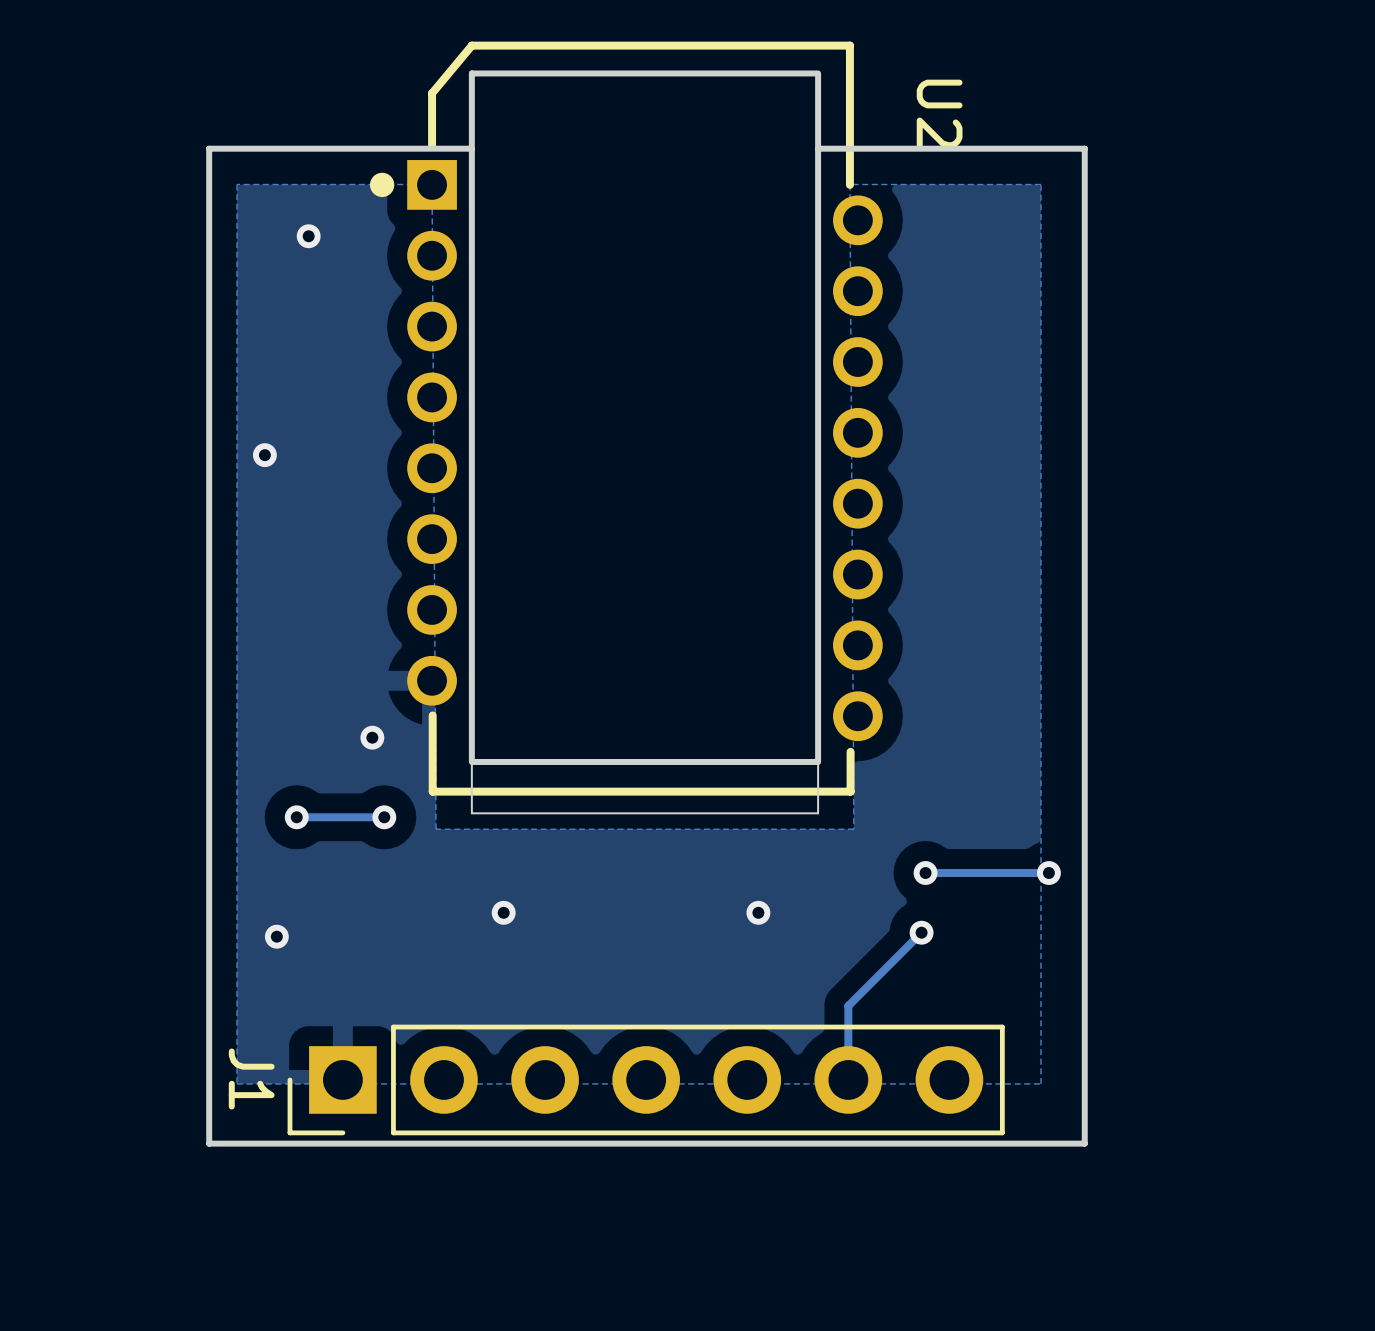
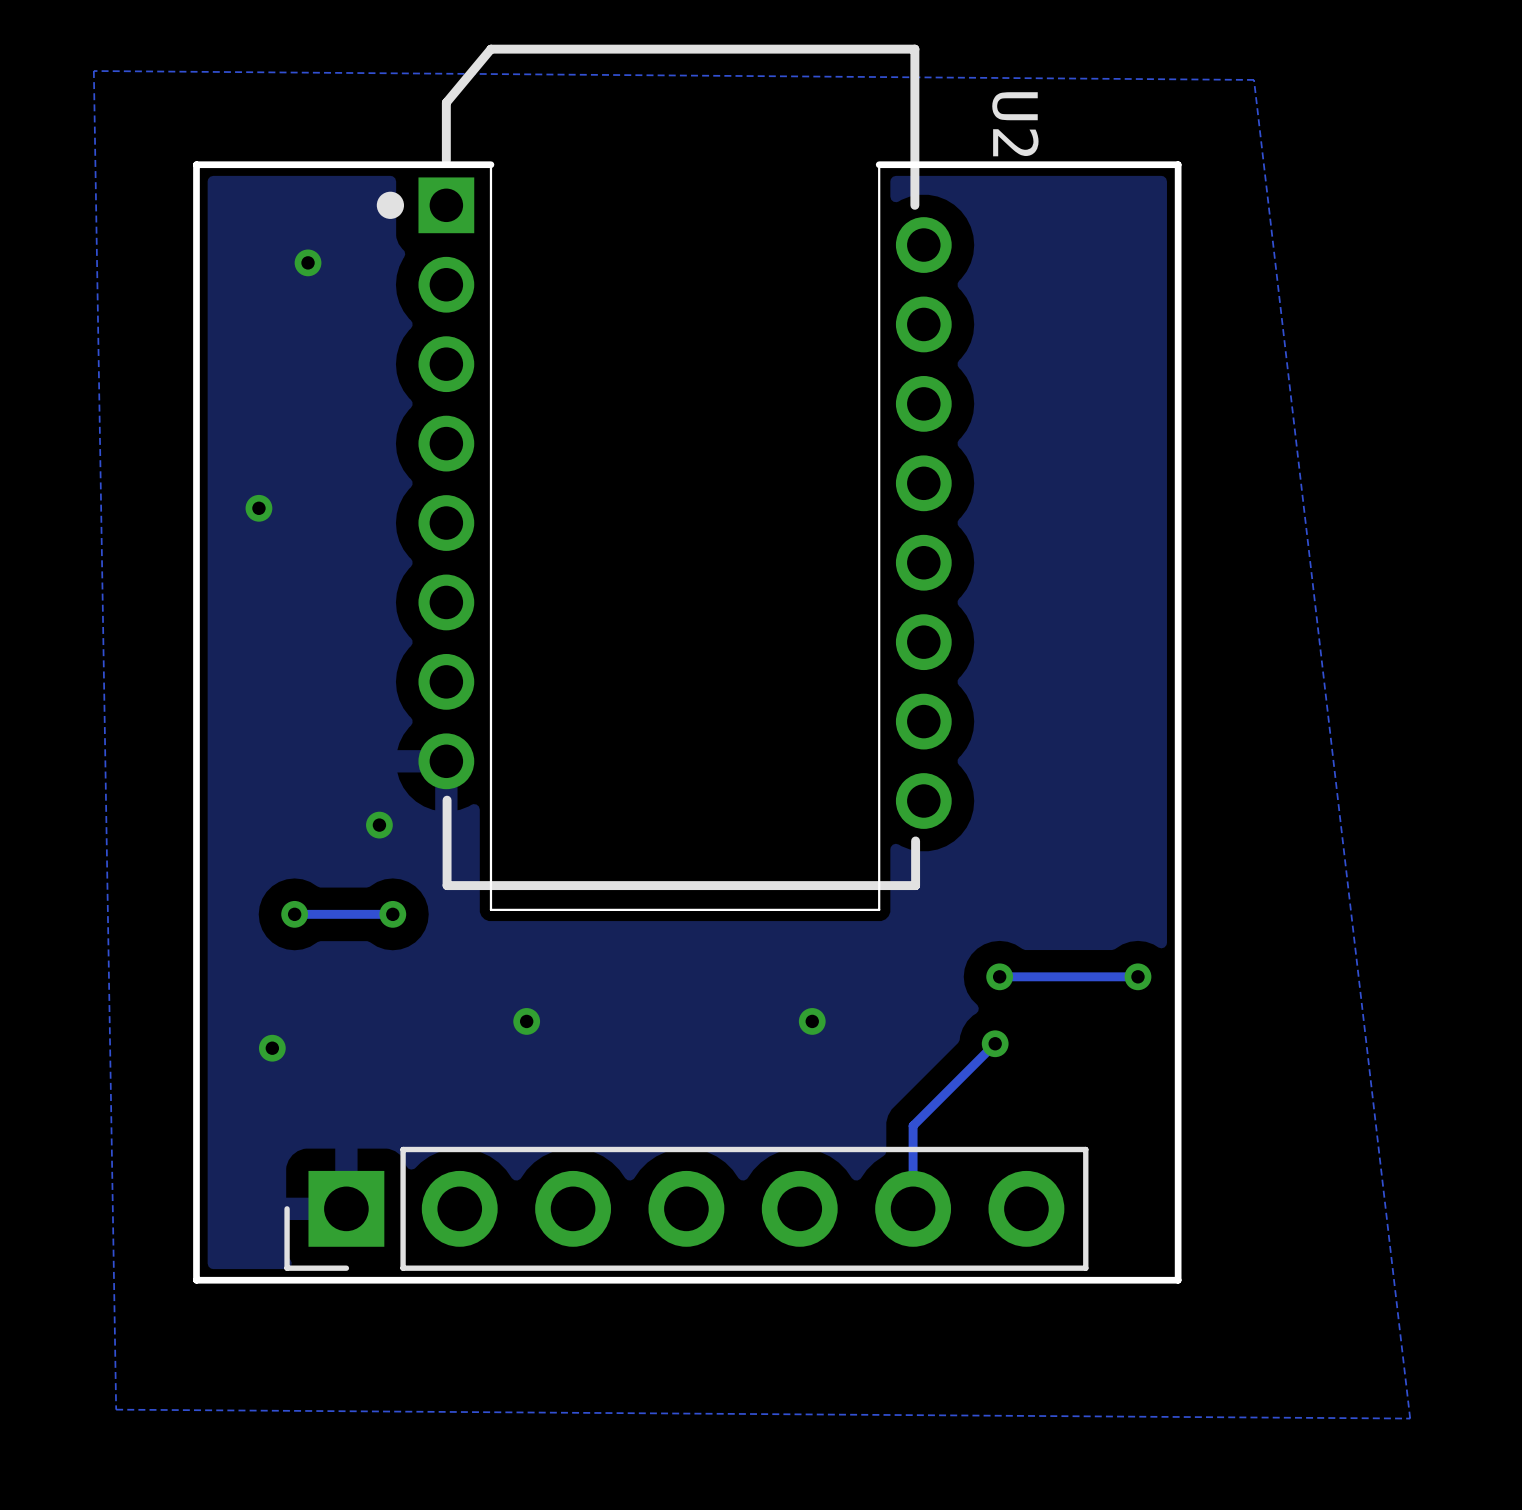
U2 footprint: [370, 41, 883, 796] -> [376, 44, 952, 891]
zone outline: (1040, 184) (849, 184) (853, 829) (436, 829) (432, 184) (237, 184) (237, 1083) (1040, 1083) (1040, 184) -> (93, 71) (1254, 79) (1410, 1418) (116, 1409) (93, 71)
J1 name: J1 (251, 1079) -> none

